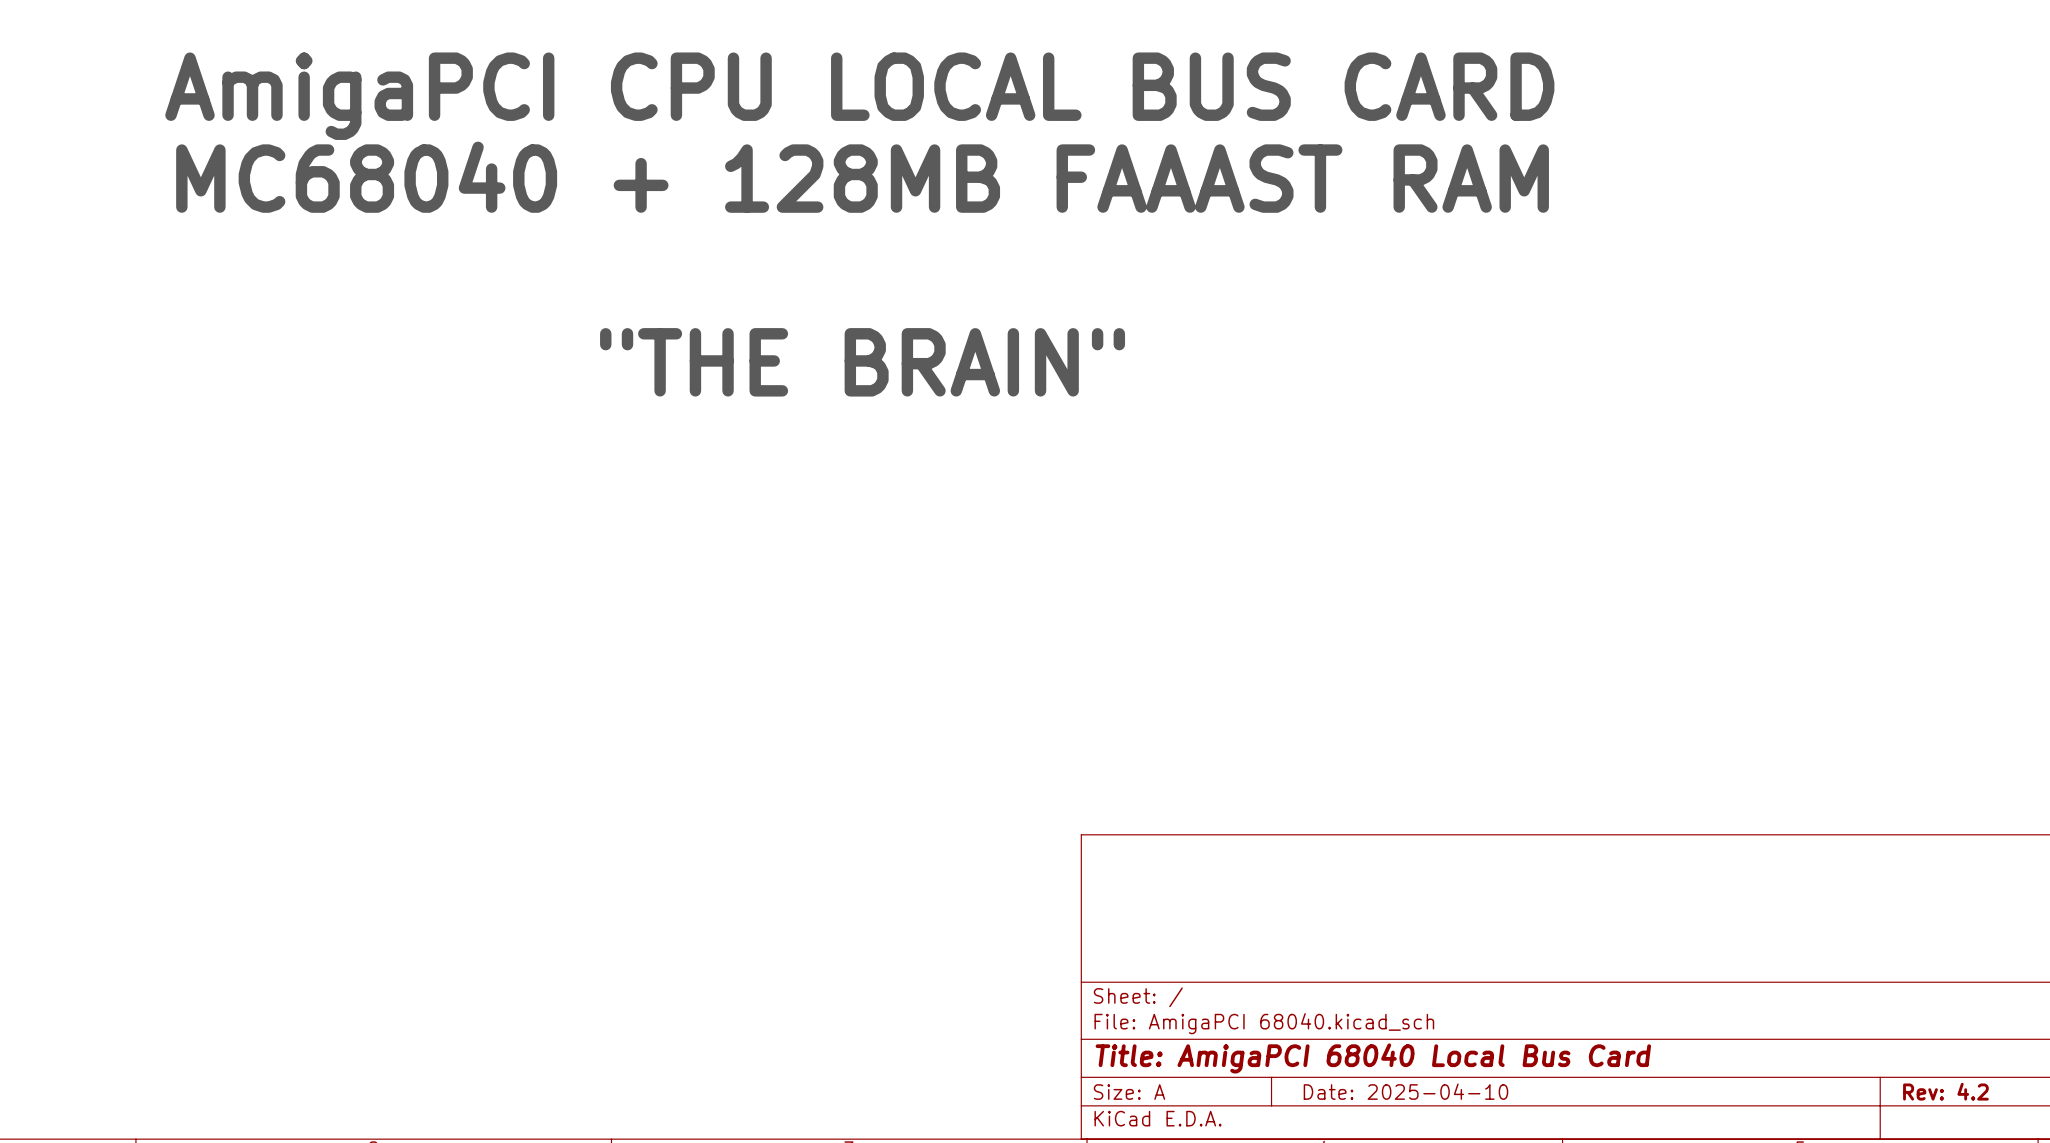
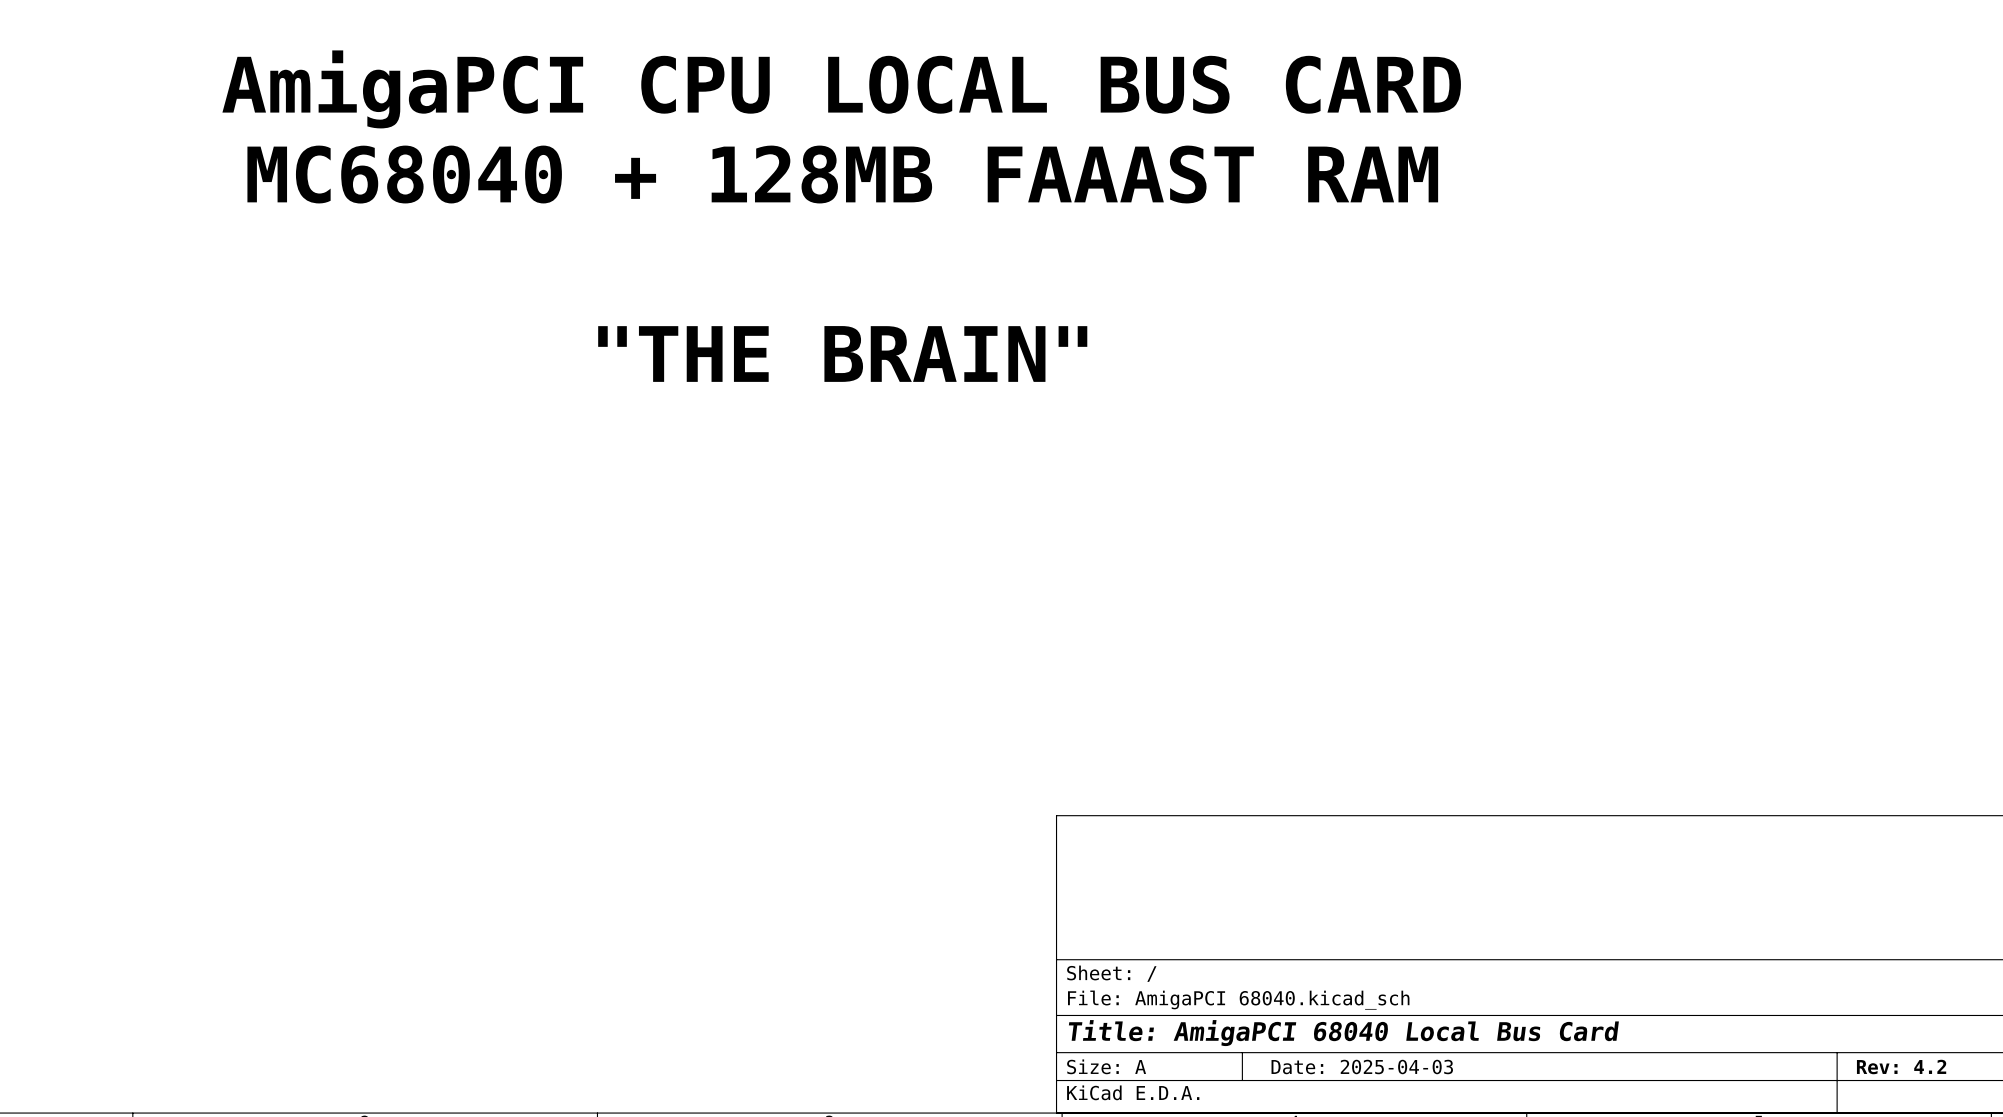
title block: Date: 2025-04-10 (1405, 1091) -> Date: 2025-04-03 (1362, 1067)

